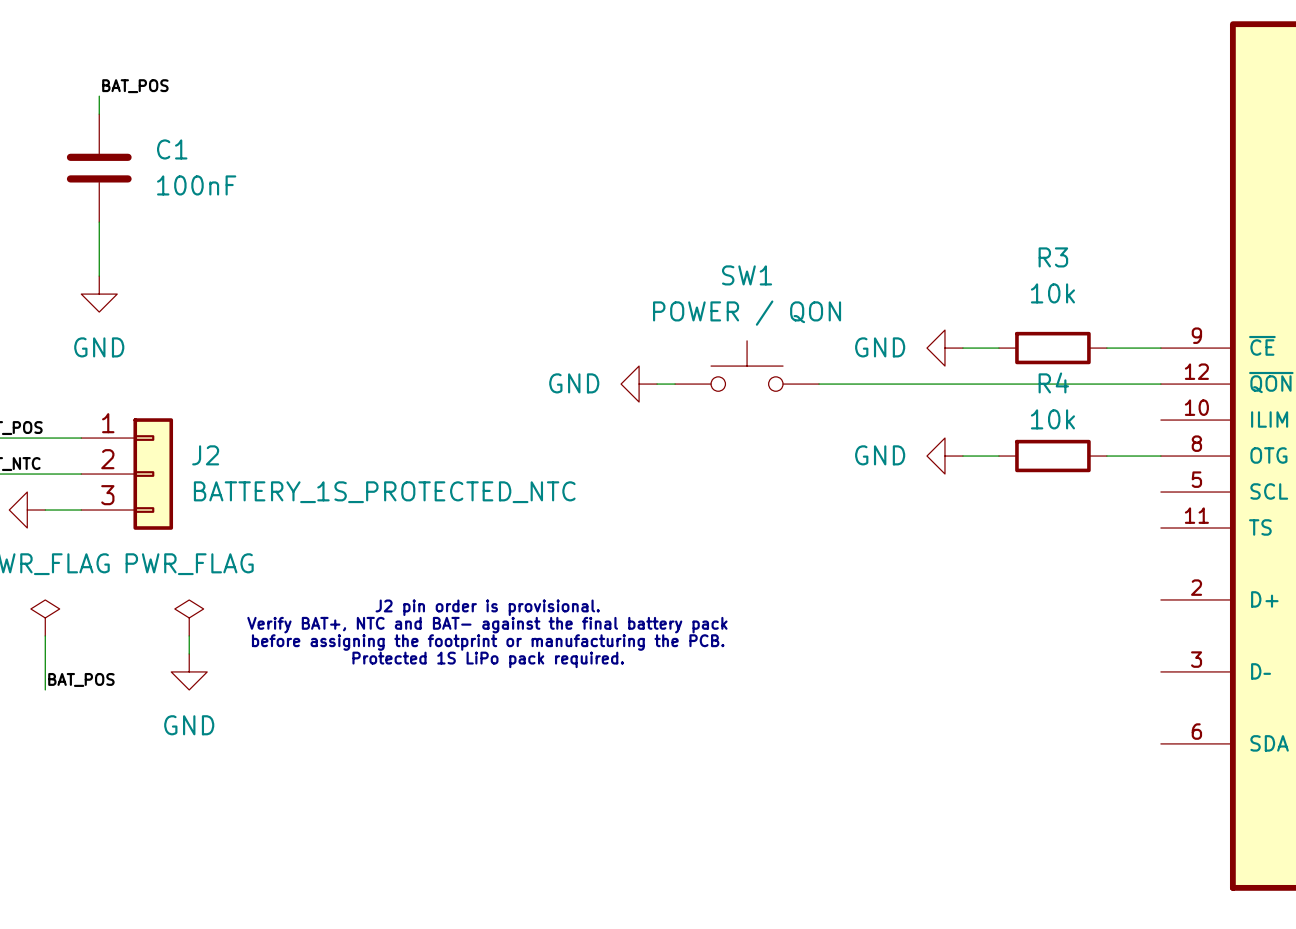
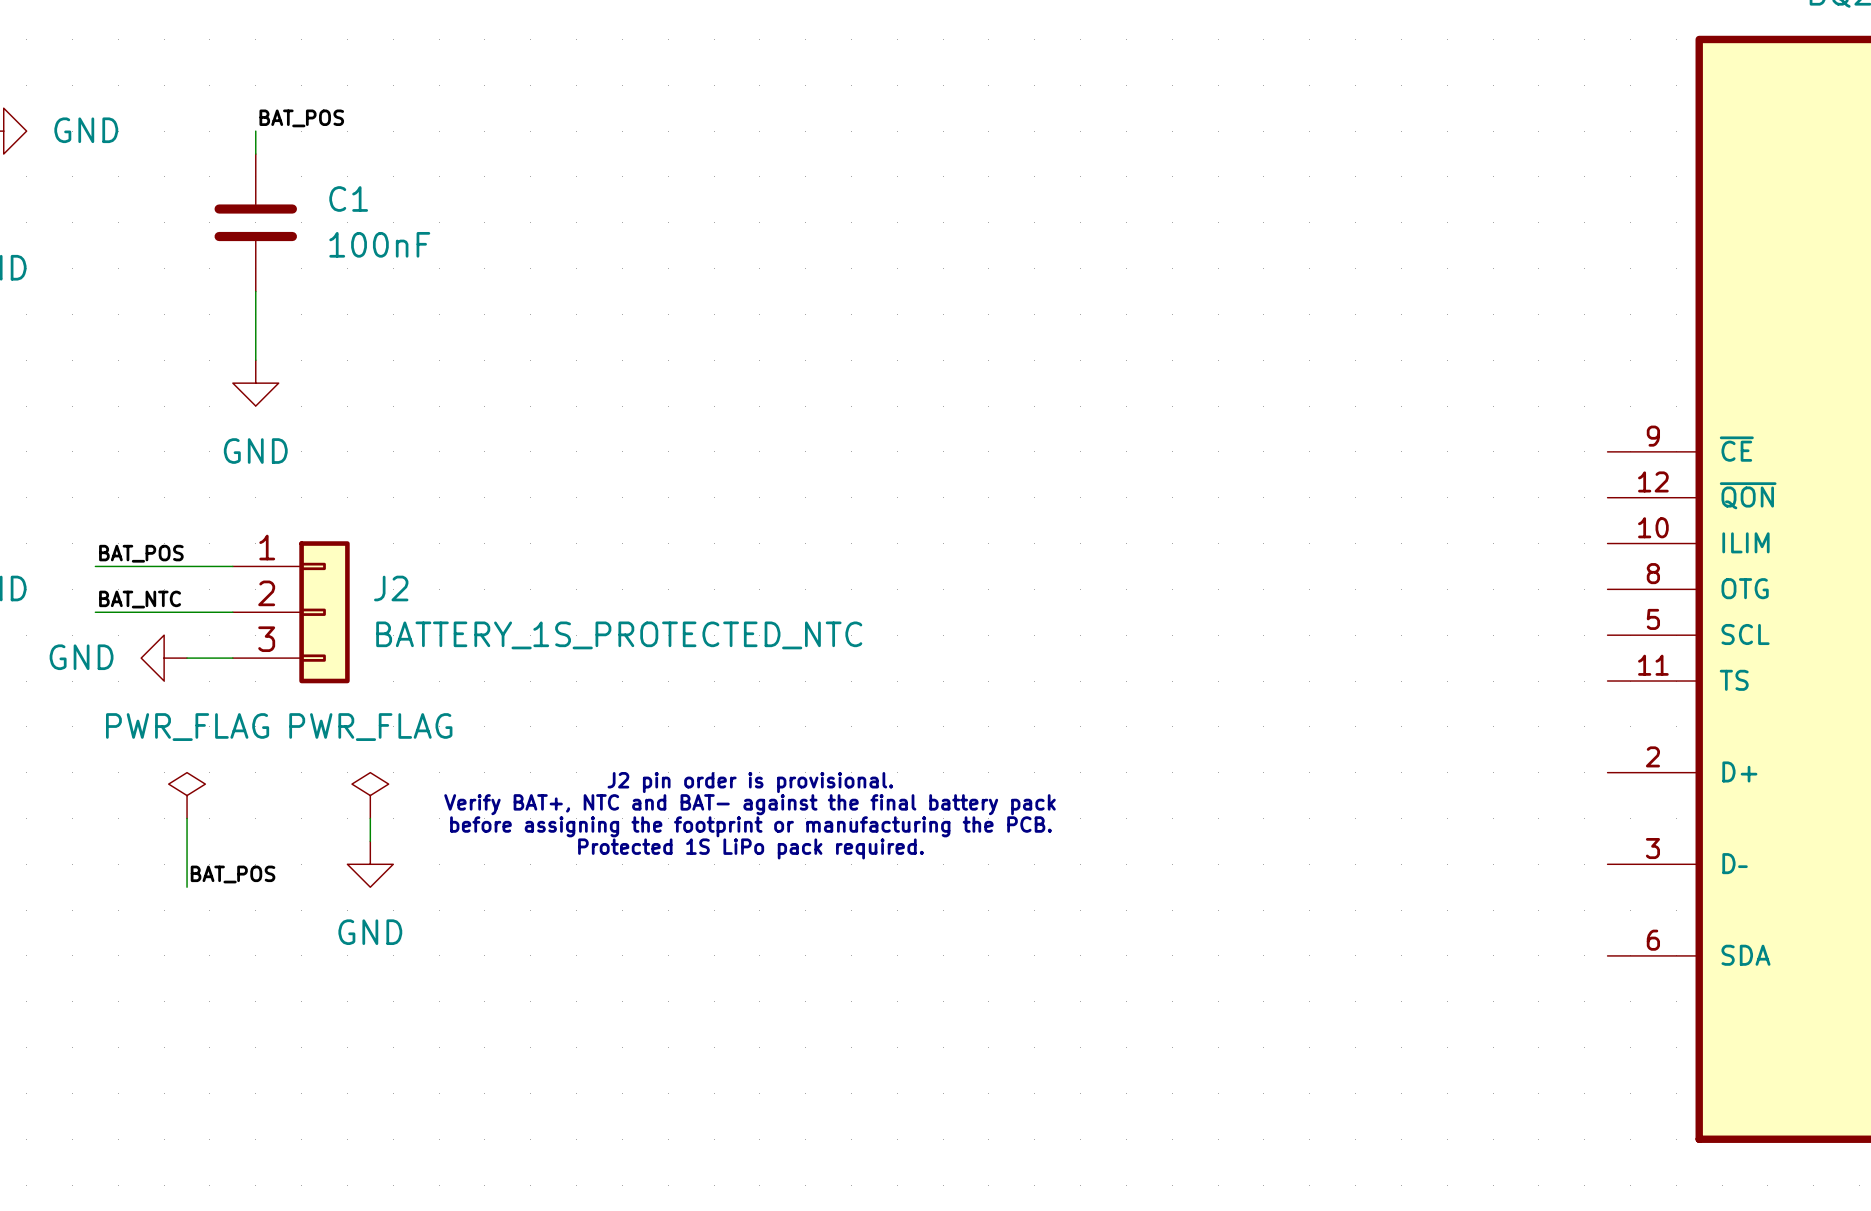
power symbol: GND (944, 348) -> none
wire: (962, 348) (998, 348) -> none
R3: 10k (1052, 348) -> none
wire: (1106, 348) (1160, 348) -> none
SW1: POWER / QON (747, 366) -> none
power symbol: GND (639, 384) -> none
wire: (657, 384) (675, 384) -> none
wire: (819, 384) (1160, 384) -> none
power symbol: GND (944, 456) -> none
wire: (962, 456) (998, 456) -> none
R4: 10k (1052, 456) -> none
wire: (1106, 456) (1160, 456) -> none

